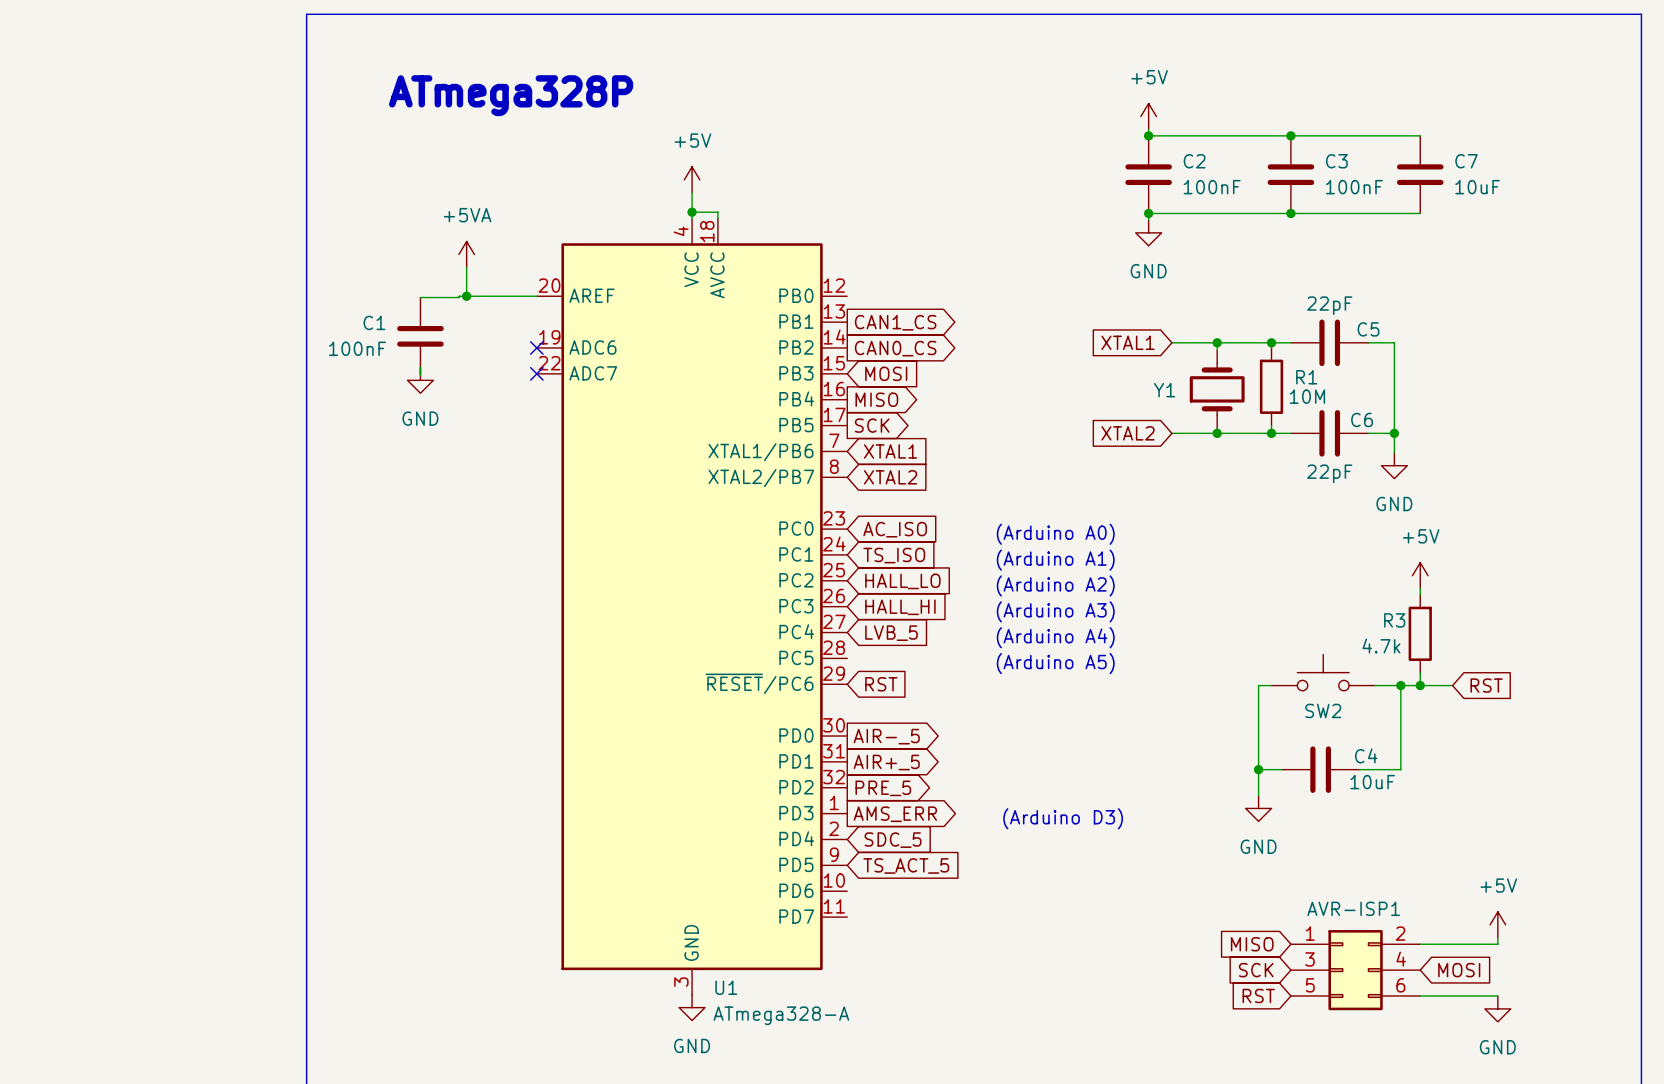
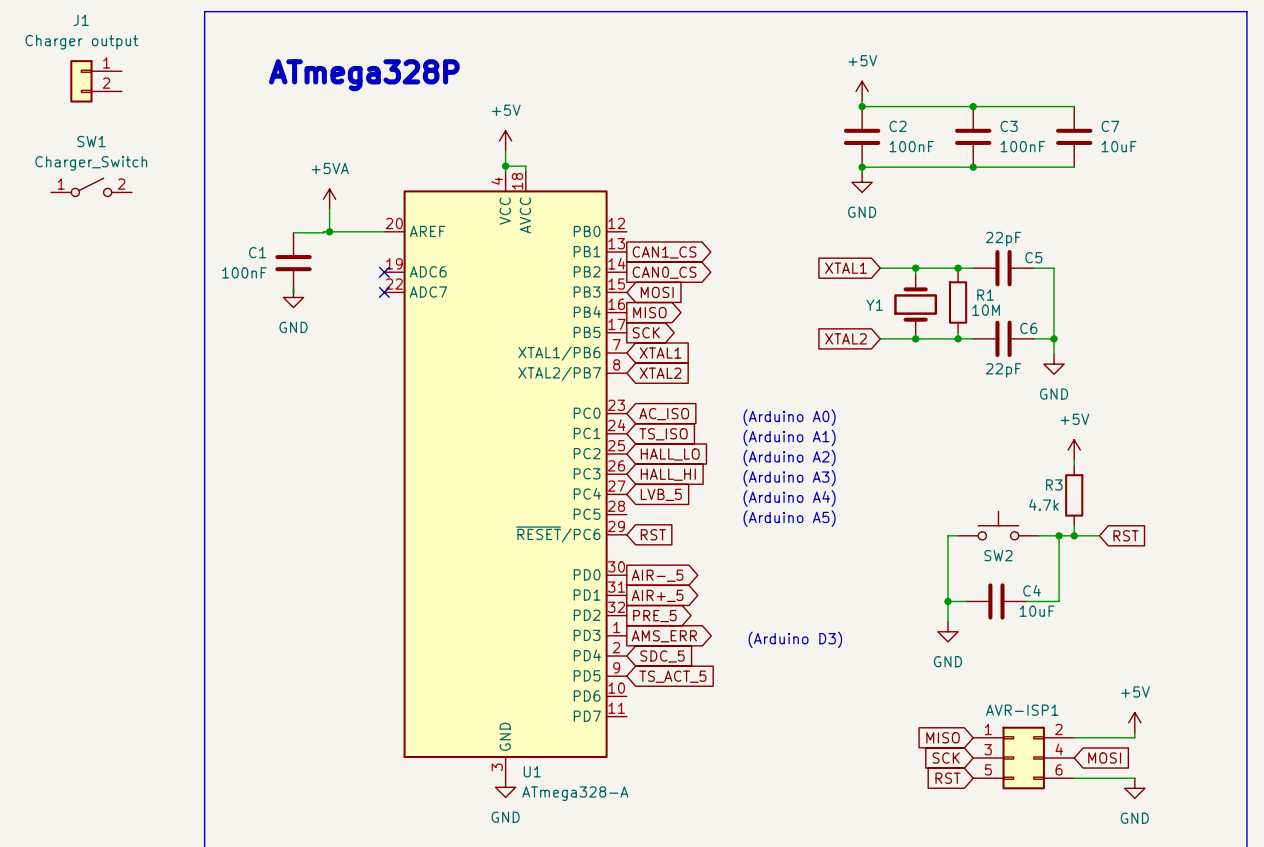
J1: none -> Charger output (96, 81)
SW1: none -> Charger_Switch (91, 187)

